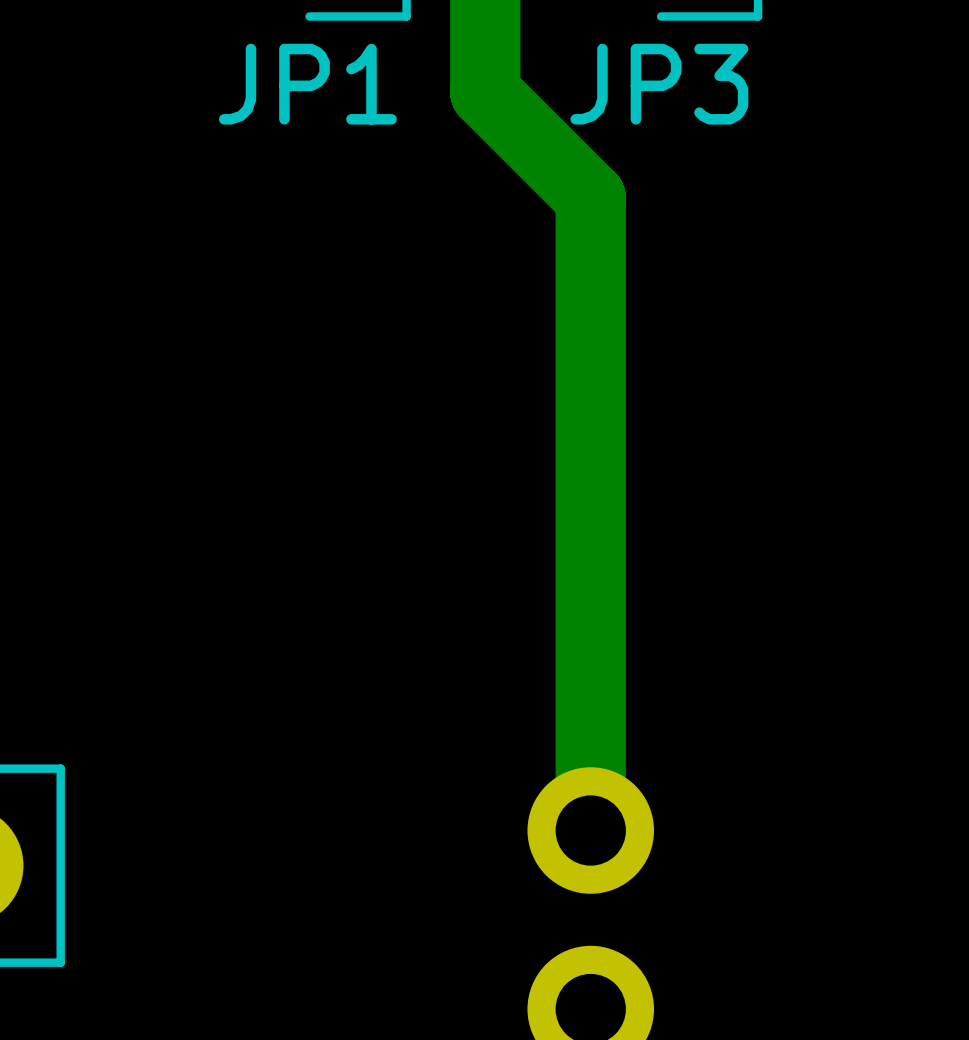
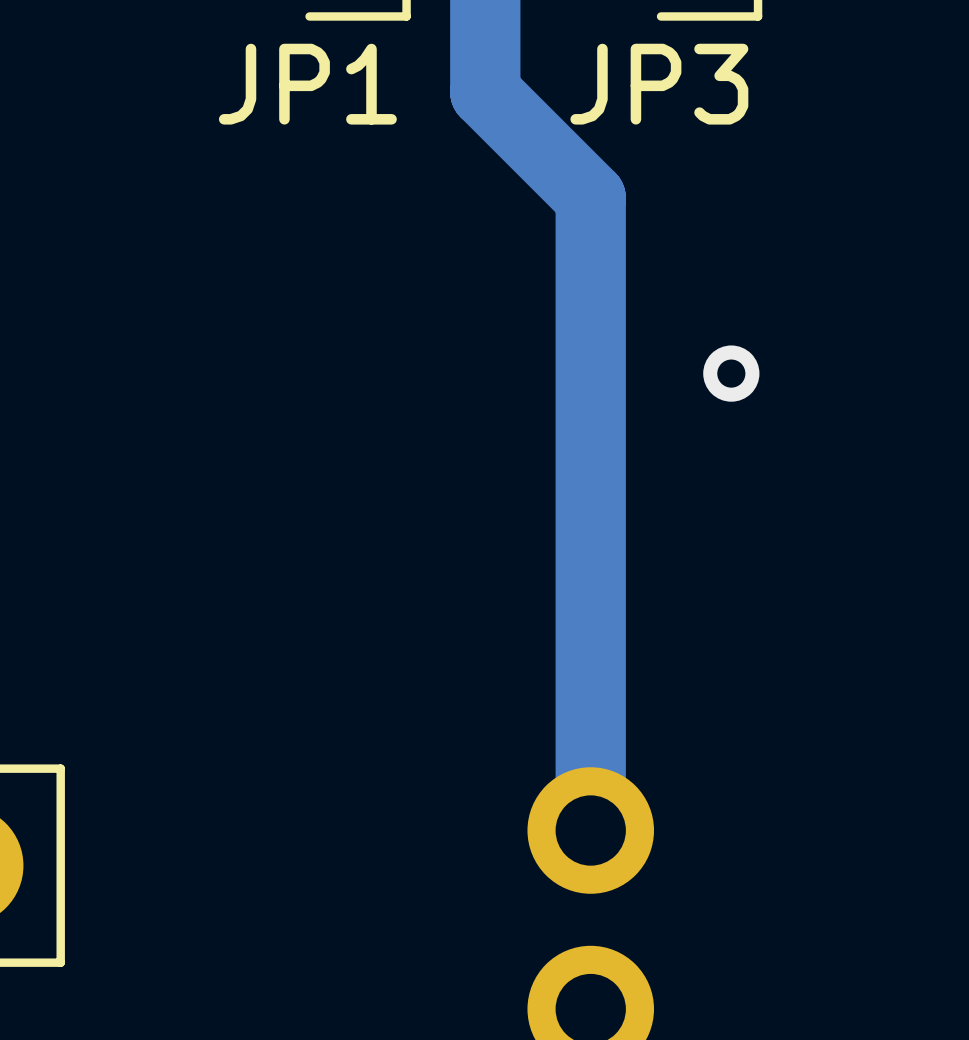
via: none -> (731, 373)

